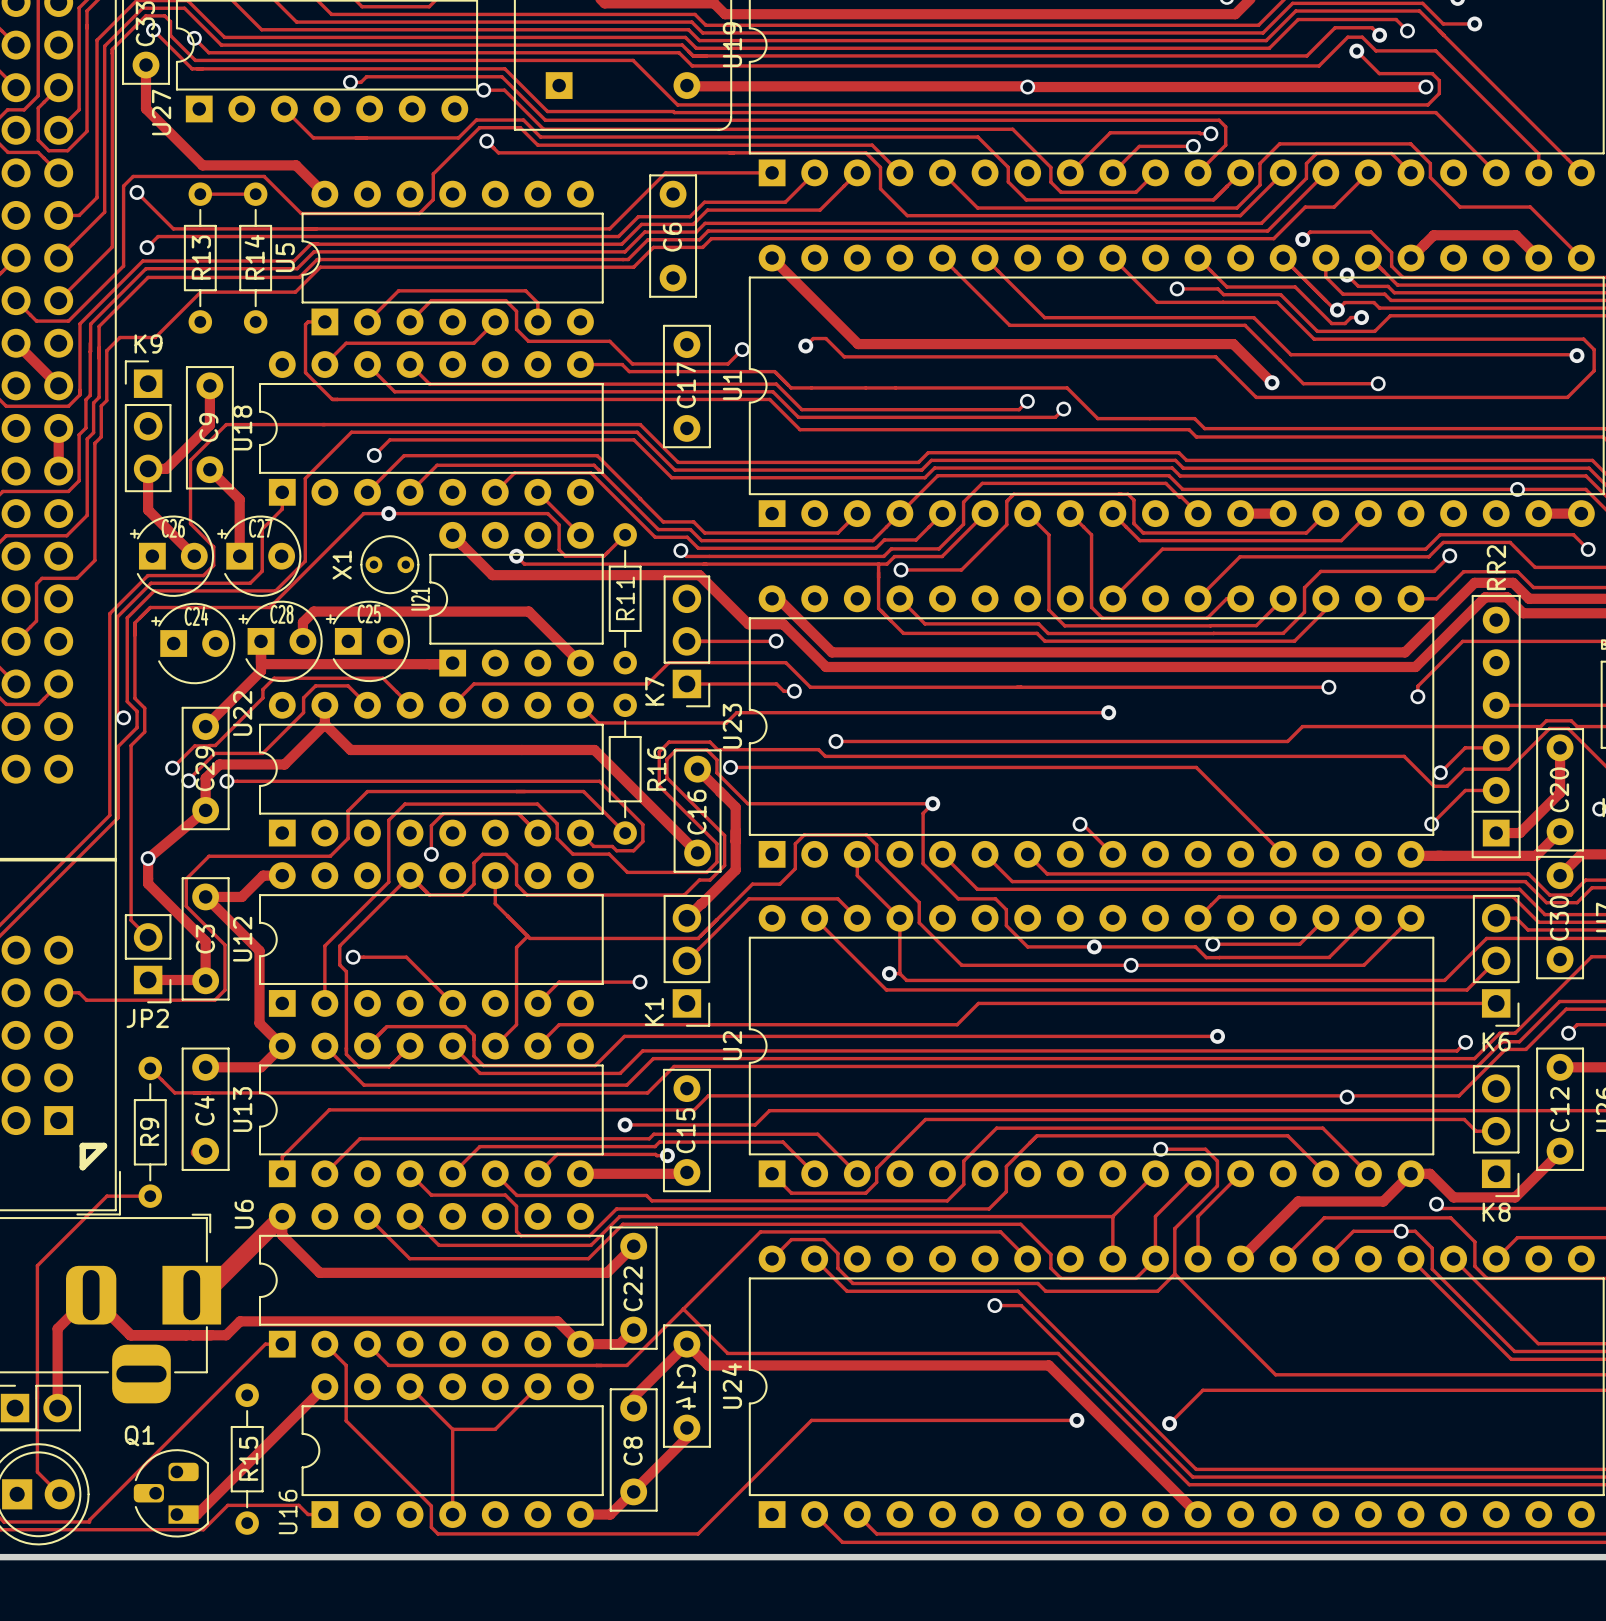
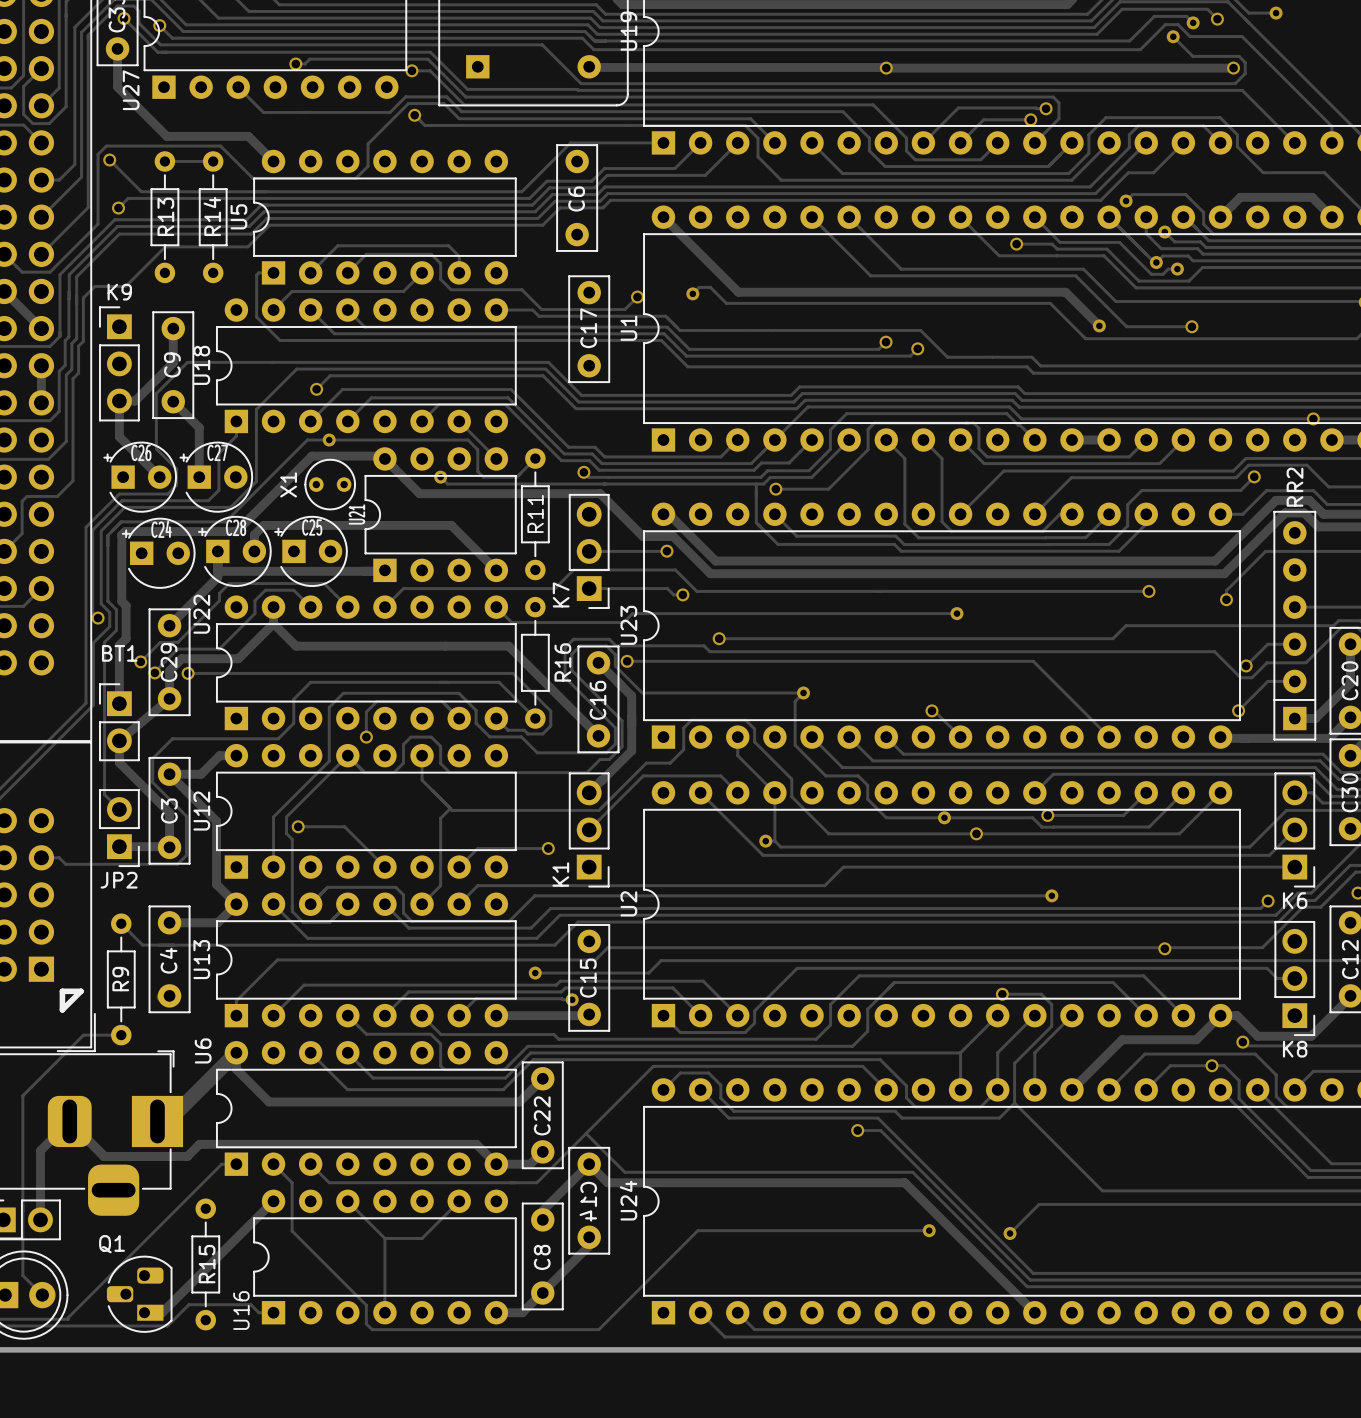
track: none -> (382, 456) (311, 456) (236, 531) (125, 531) (121, 535) (121, 601) (126, 605) (126, 638) (119, 645) (119, 703)
BT1: none -> (119, 722)
via: (148, 858) -> none

